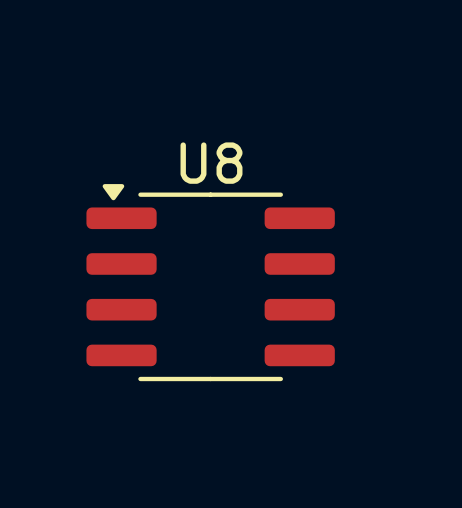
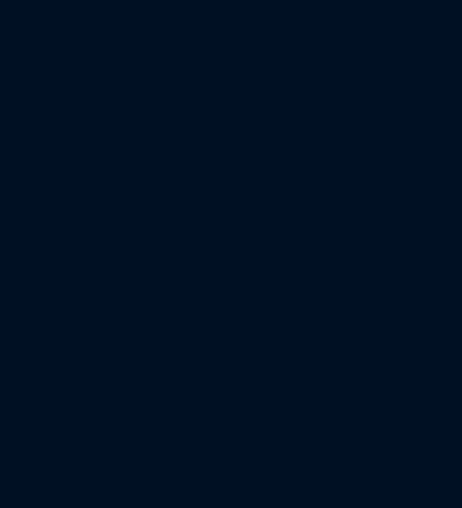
U8: (210, 282) -> none

